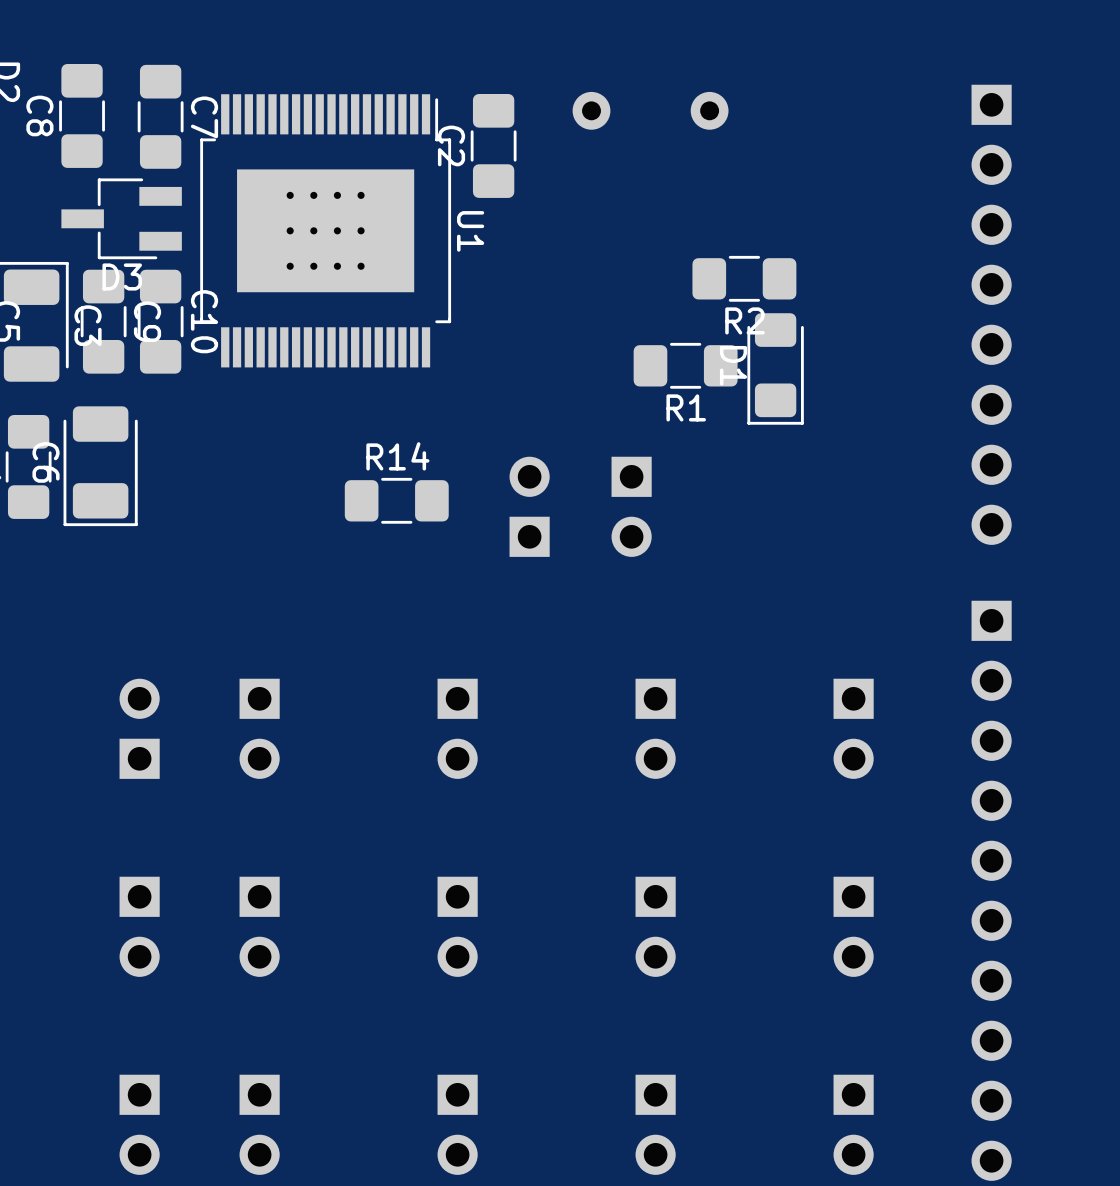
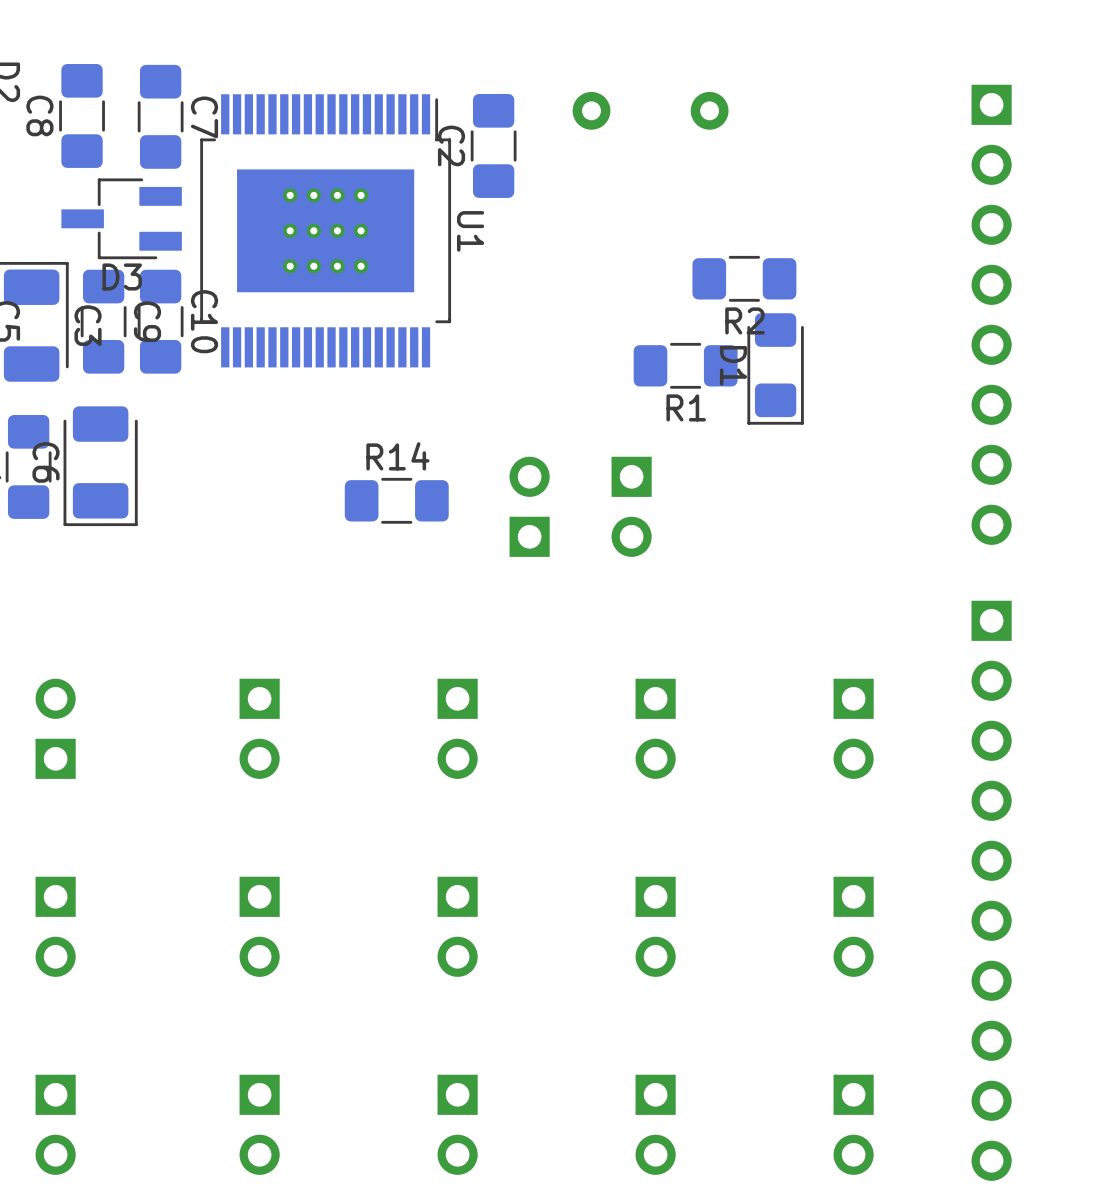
part position: (139, 728) -> (55, 728)
part position: (139, 926) -> (55, 926)
part position: (139, 1124) -> (55, 1124)

